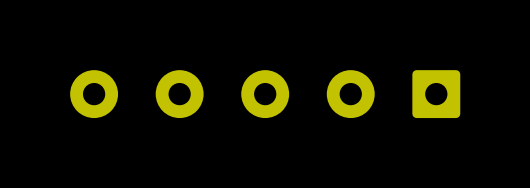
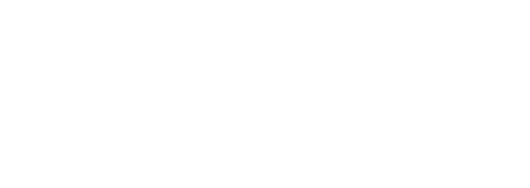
part: (265, 94) -> none

